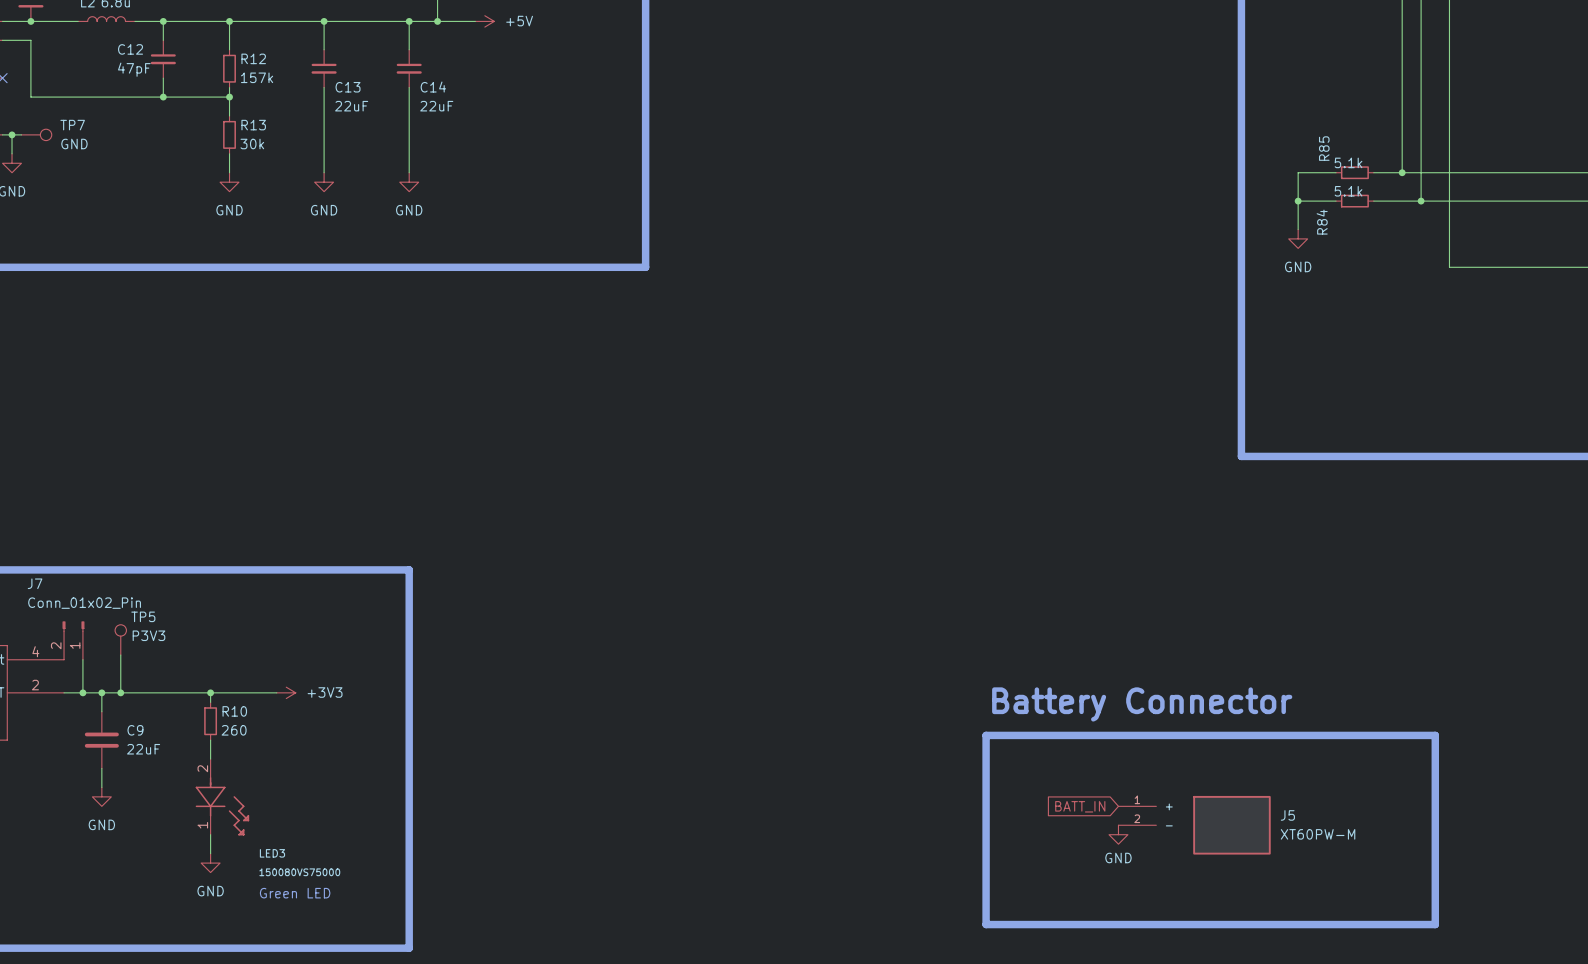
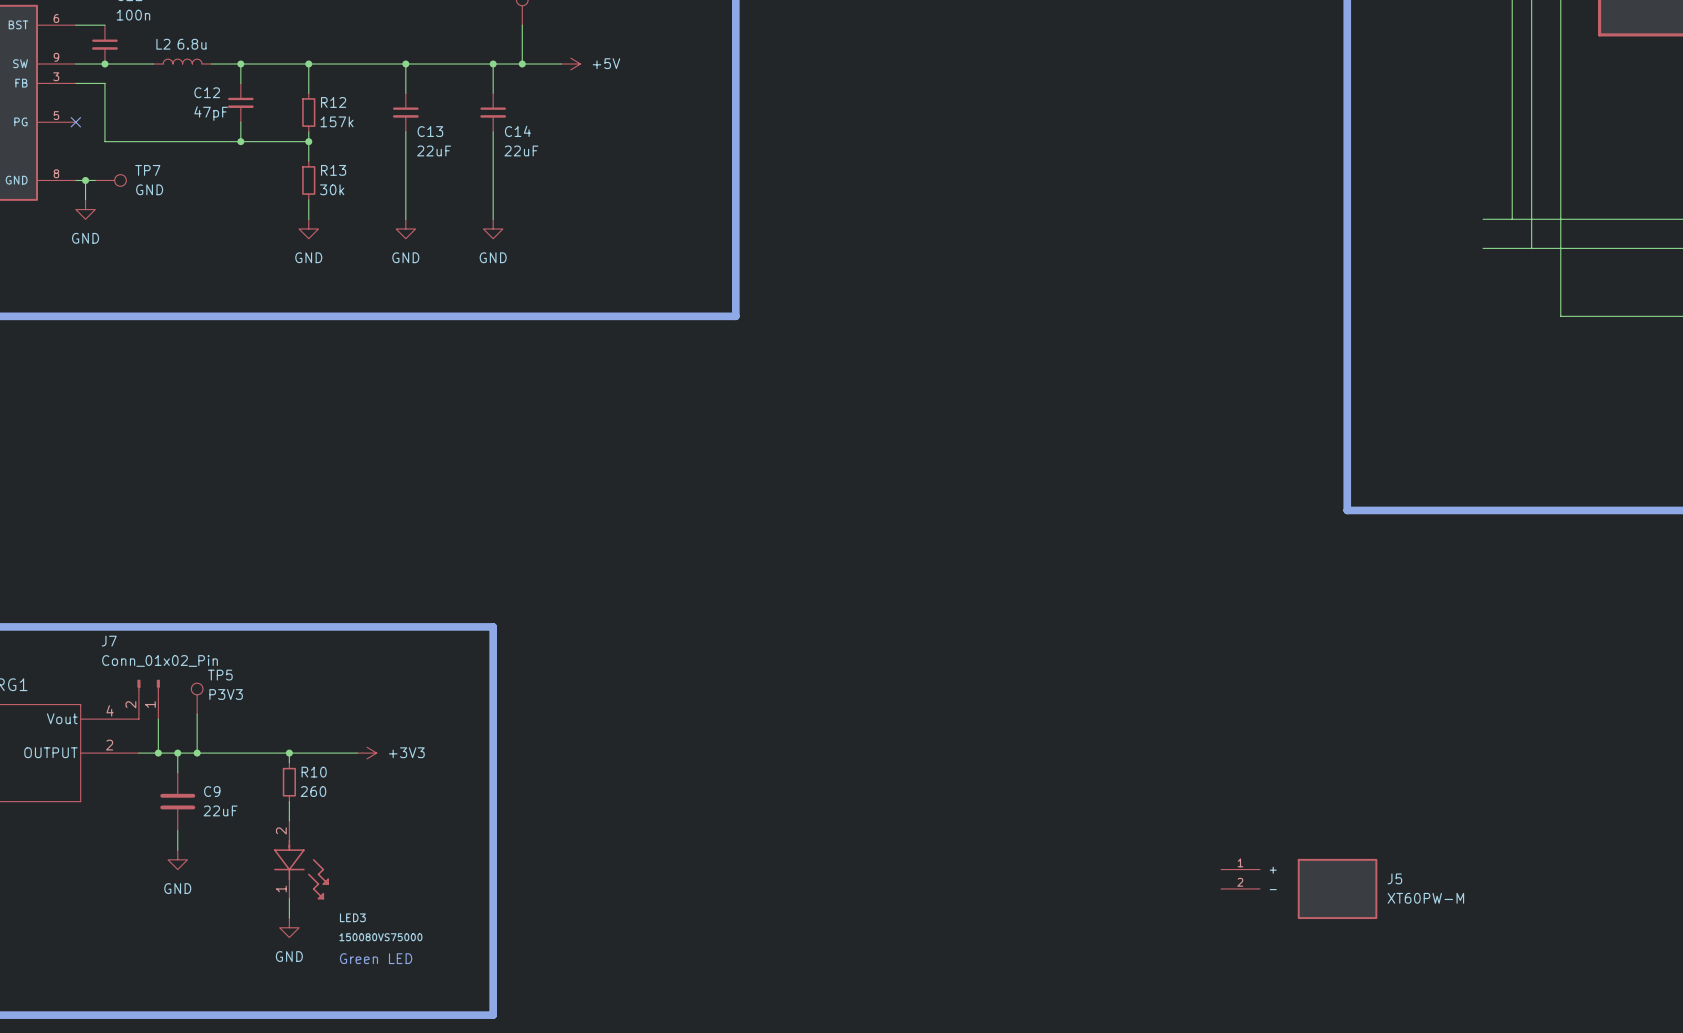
wire: (1335, 172) (1298, 172) (1298, 229) -> none
R85: 5.1k (1354, 172) -> none
junction: (1402, 172) -> none
wire: (1298, 201) (1335, 201) -> none
junction: (1298, 201) -> none
R84: 5.1k (1354, 201) -> none
junction: (1421, 201) -> none
power symbol: GND (1298, 238) -> none
text: Battery Connector (1142, 704) -> none
line: (986, 735) (1435, 735) (1435, 924) (986, 924) (986, 735) -> none
global label: BATT_IN (1080, 806) -> none
power symbol: GND (1118, 834) -> none

